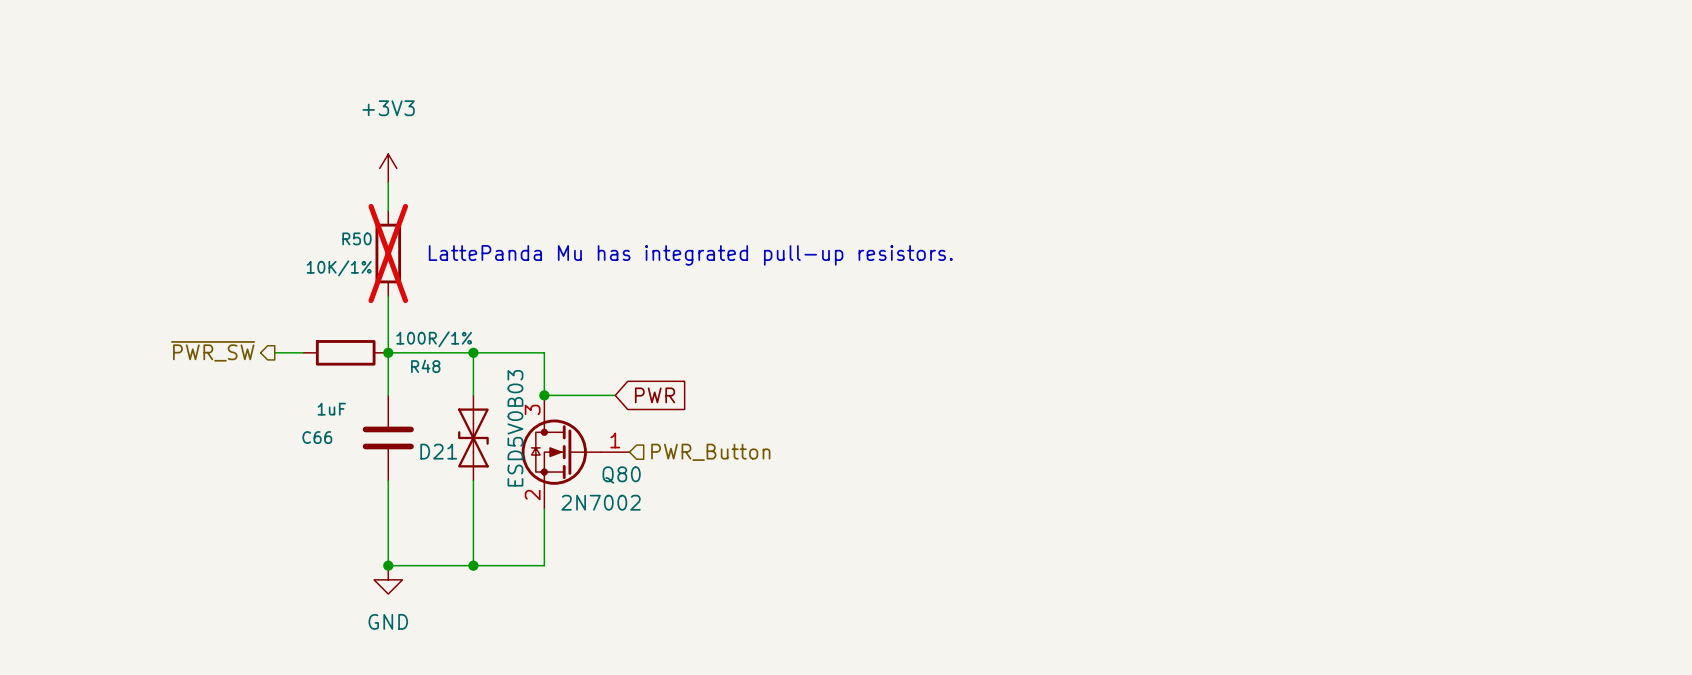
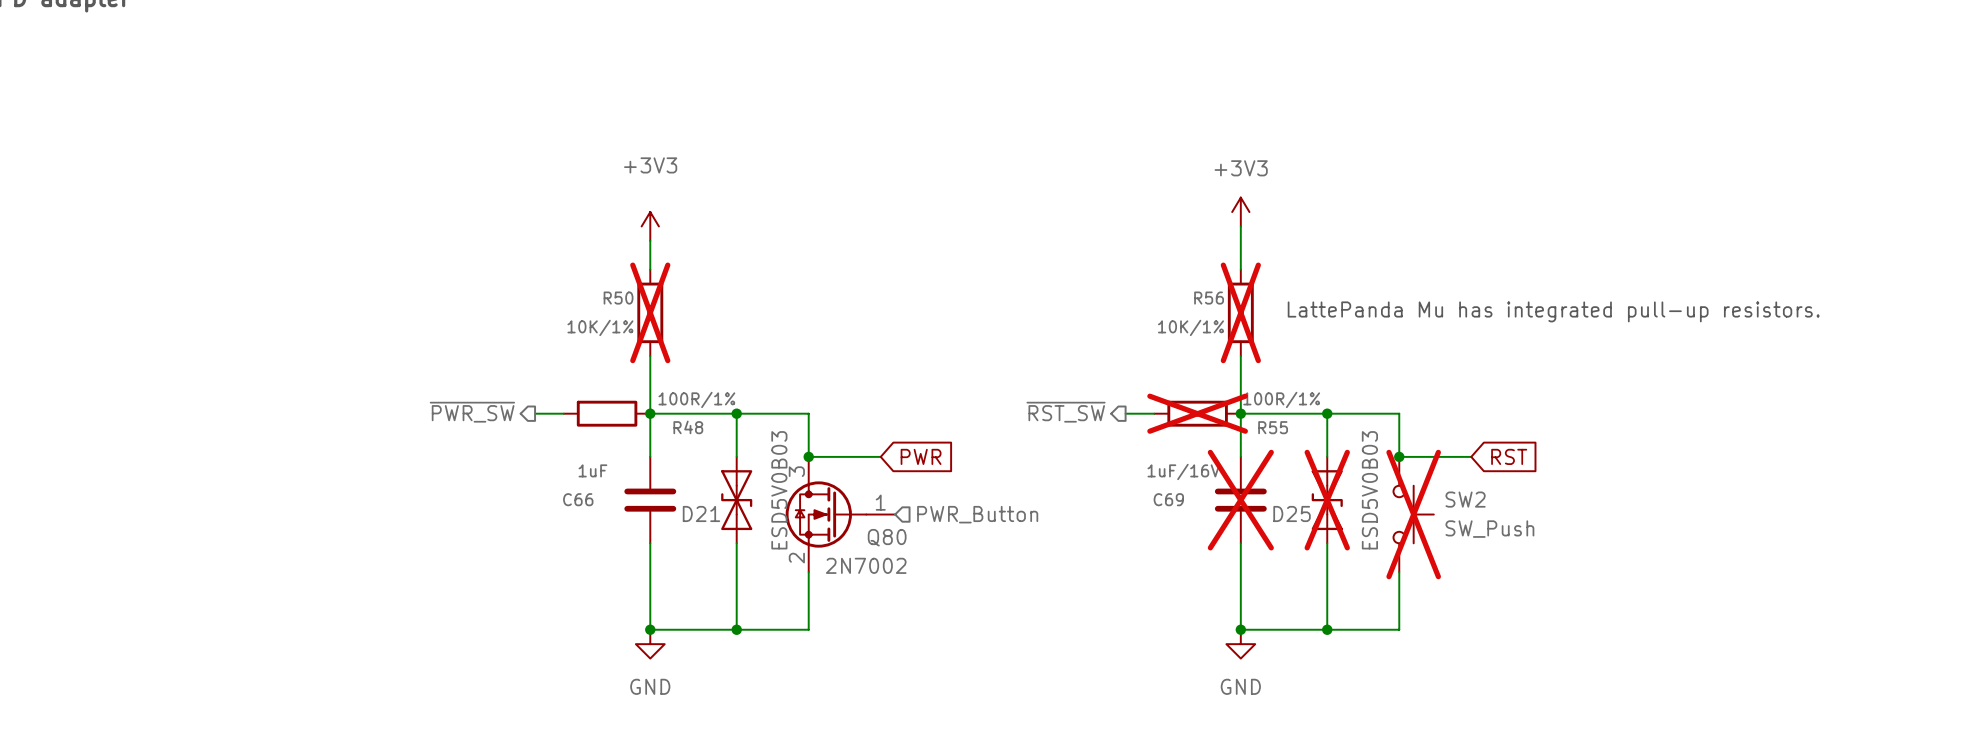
power symbol: none -> +3V3 (1240, 212)
wire: none -> (1240, 226) (1240, 269)
text: none -> LattePanda Mu has integrated pull-up resistors. (1553, 311)
R56: none -> 10K/1% (1240, 312)
text: LattePanda Mu has integrated pull-up resistors. (690, 255) -> none
wire: none -> (1240, 356) (1240, 456)
hierarchical label: none -> ~{RST_SW} (1066, 412)
wire: none -> (1125, 413) (1154, 413)
R55: none -> 100R/1% (1197, 413)
wire: none -> (1240, 413) (1399, 413) (1399, 456) (1471, 456)
junction: none -> (1240, 413)
wire: none -> (1327, 413) (1327, 456)
junction: none -> (1327, 413)
junction: none -> (1399, 456)
global label: none -> RST (1509, 456)
C69: none -> 1uF/16V (1240, 500)
D25: none -> ESD5V0B03 (1327, 500)
SW2: none -> SW_Push (1413, 514)
wire: none -> (1240, 543) (1240, 629) (1399, 629) (1399, 572)
wire: none -> (1327, 543) (1327, 629)
junction: none -> (1240, 629)
junction: none -> (1327, 629)
power symbol: none -> GND (1240, 644)

